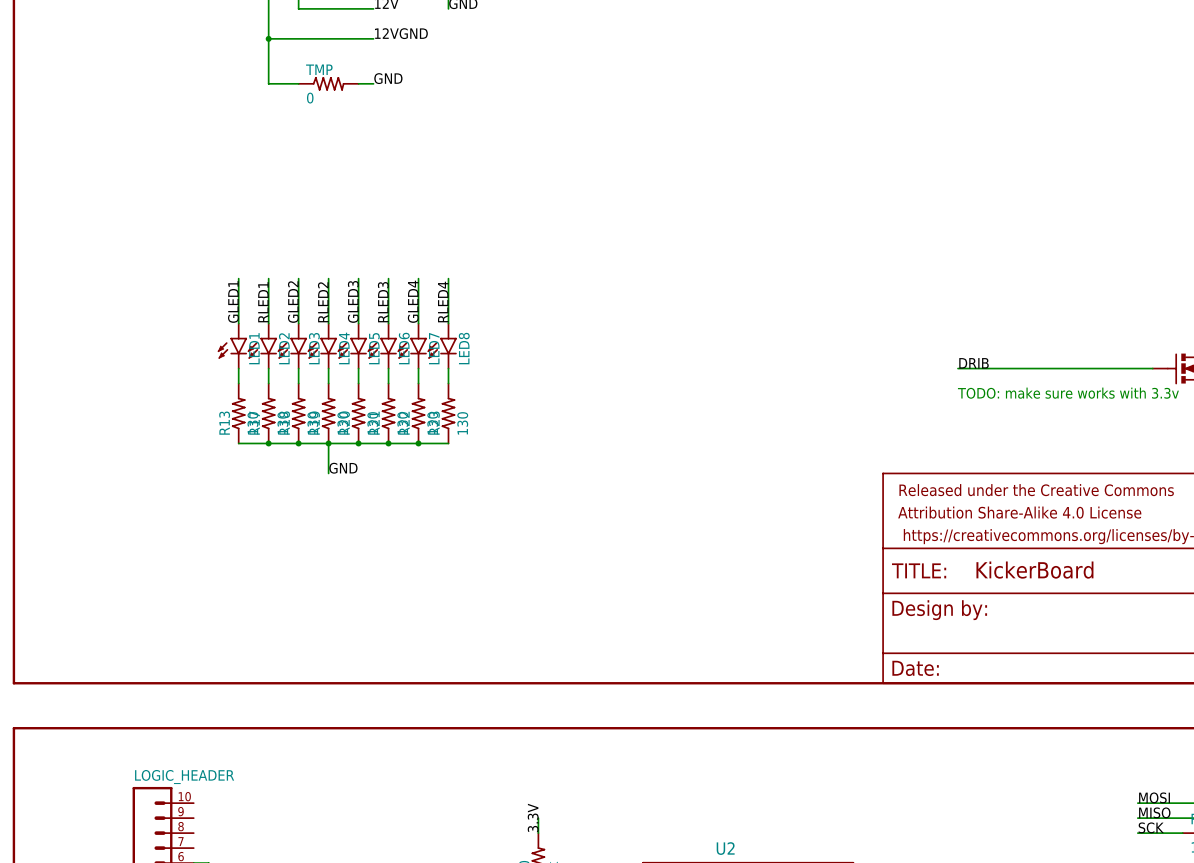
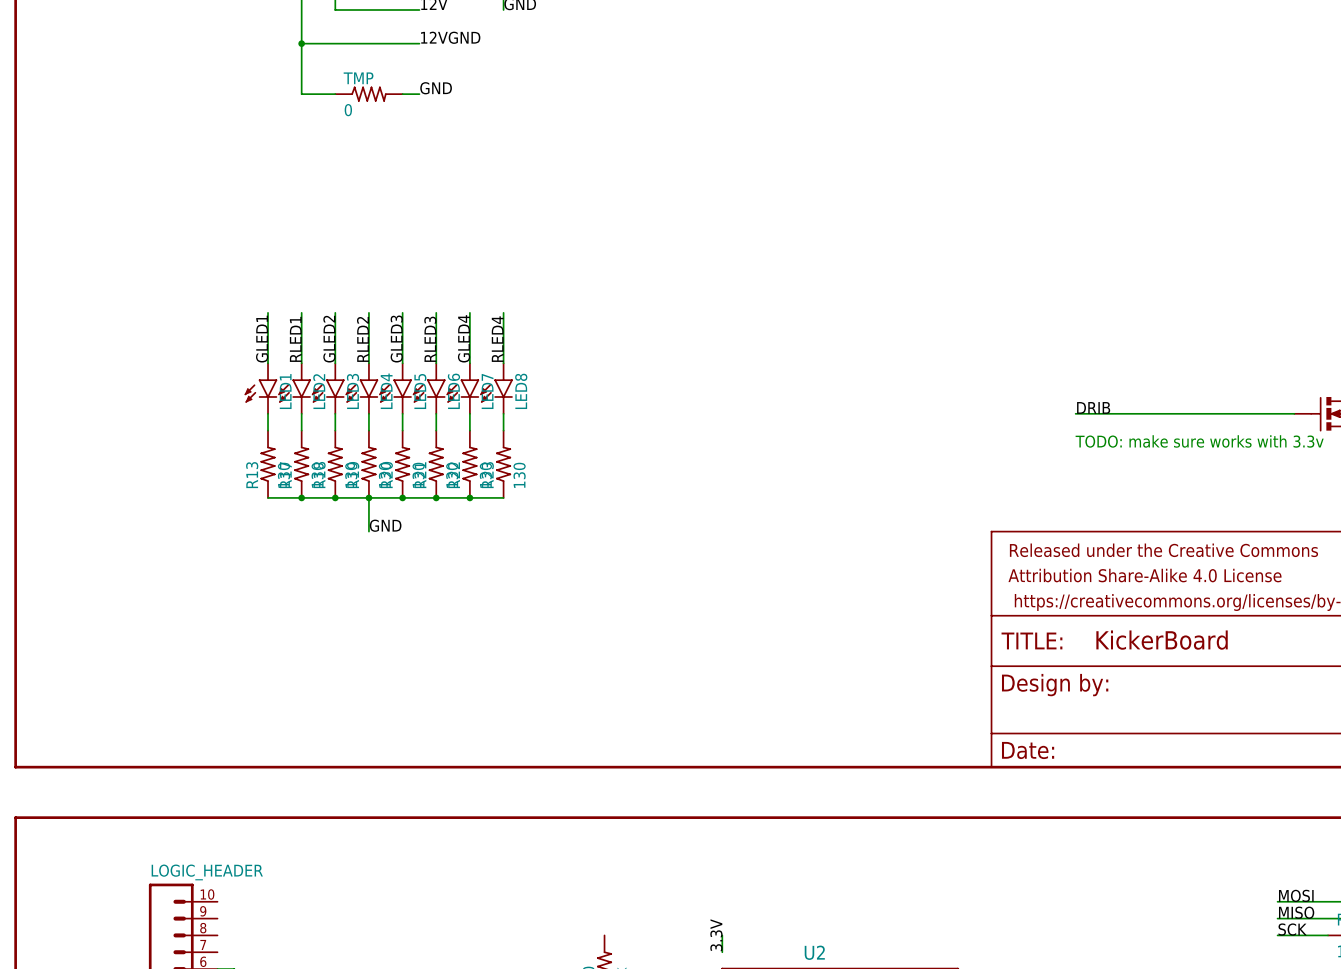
label: 3.3V (533, 817) -> none
wire: (538, 818) (538, 833) -> (722, 935) (722, 952)
label: none -> 3.3V (716, 935)

